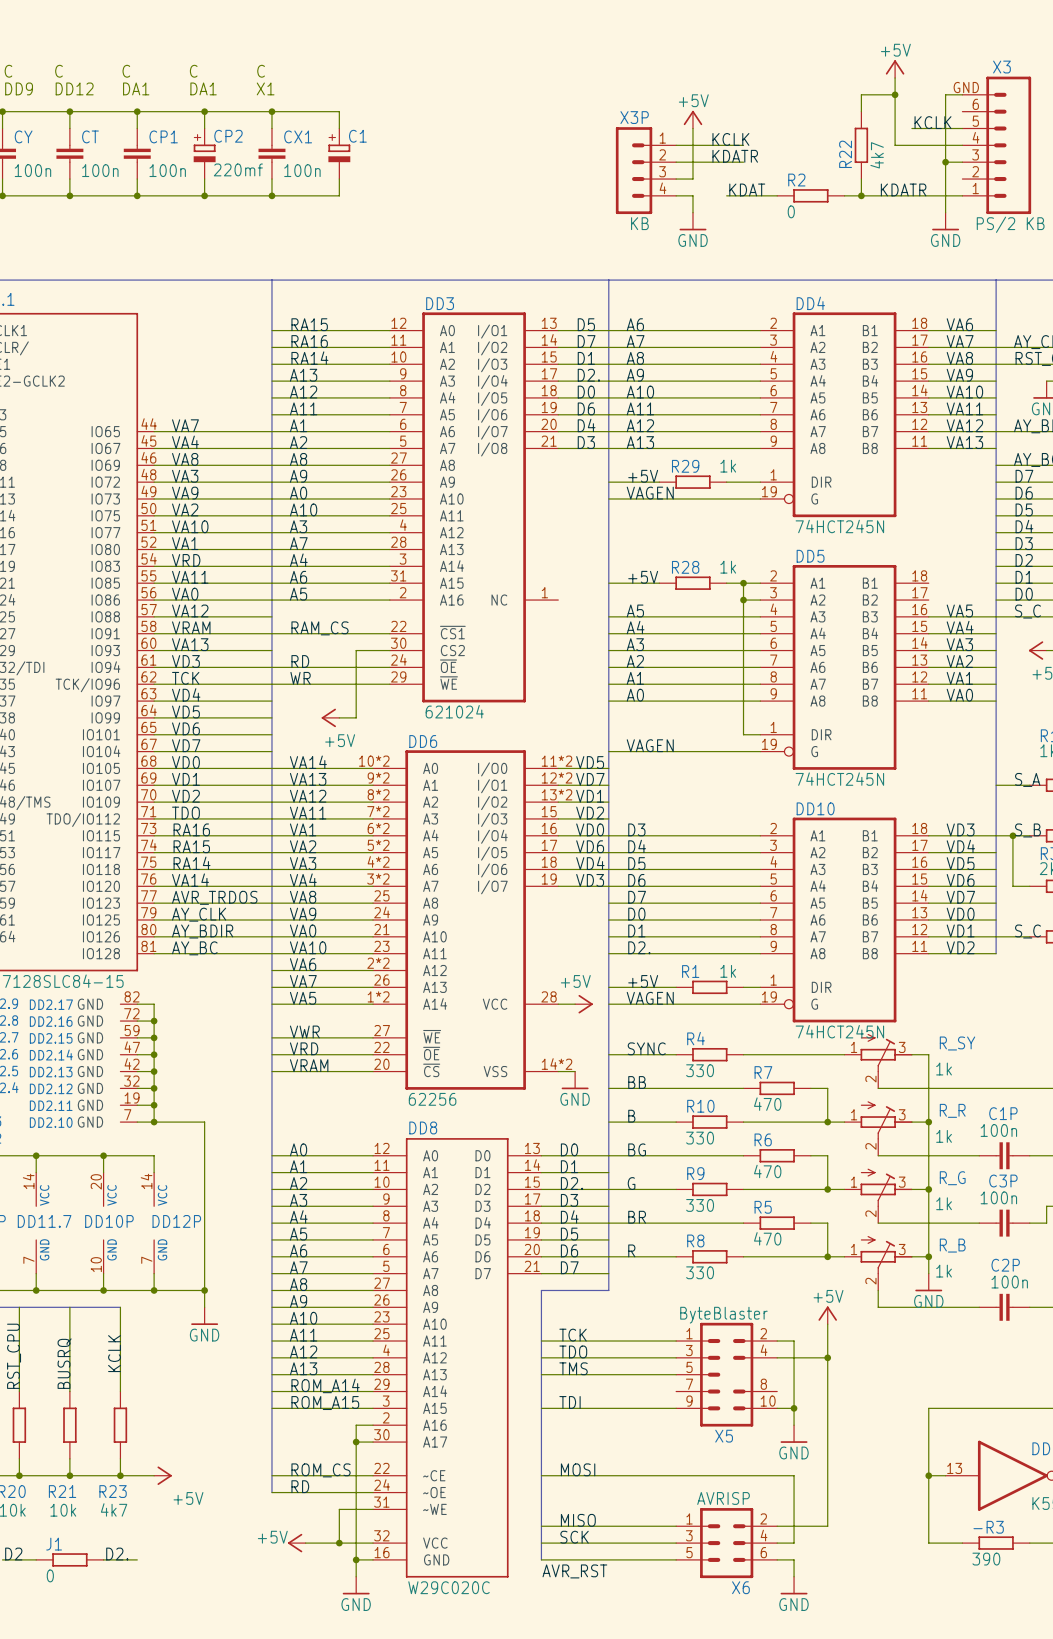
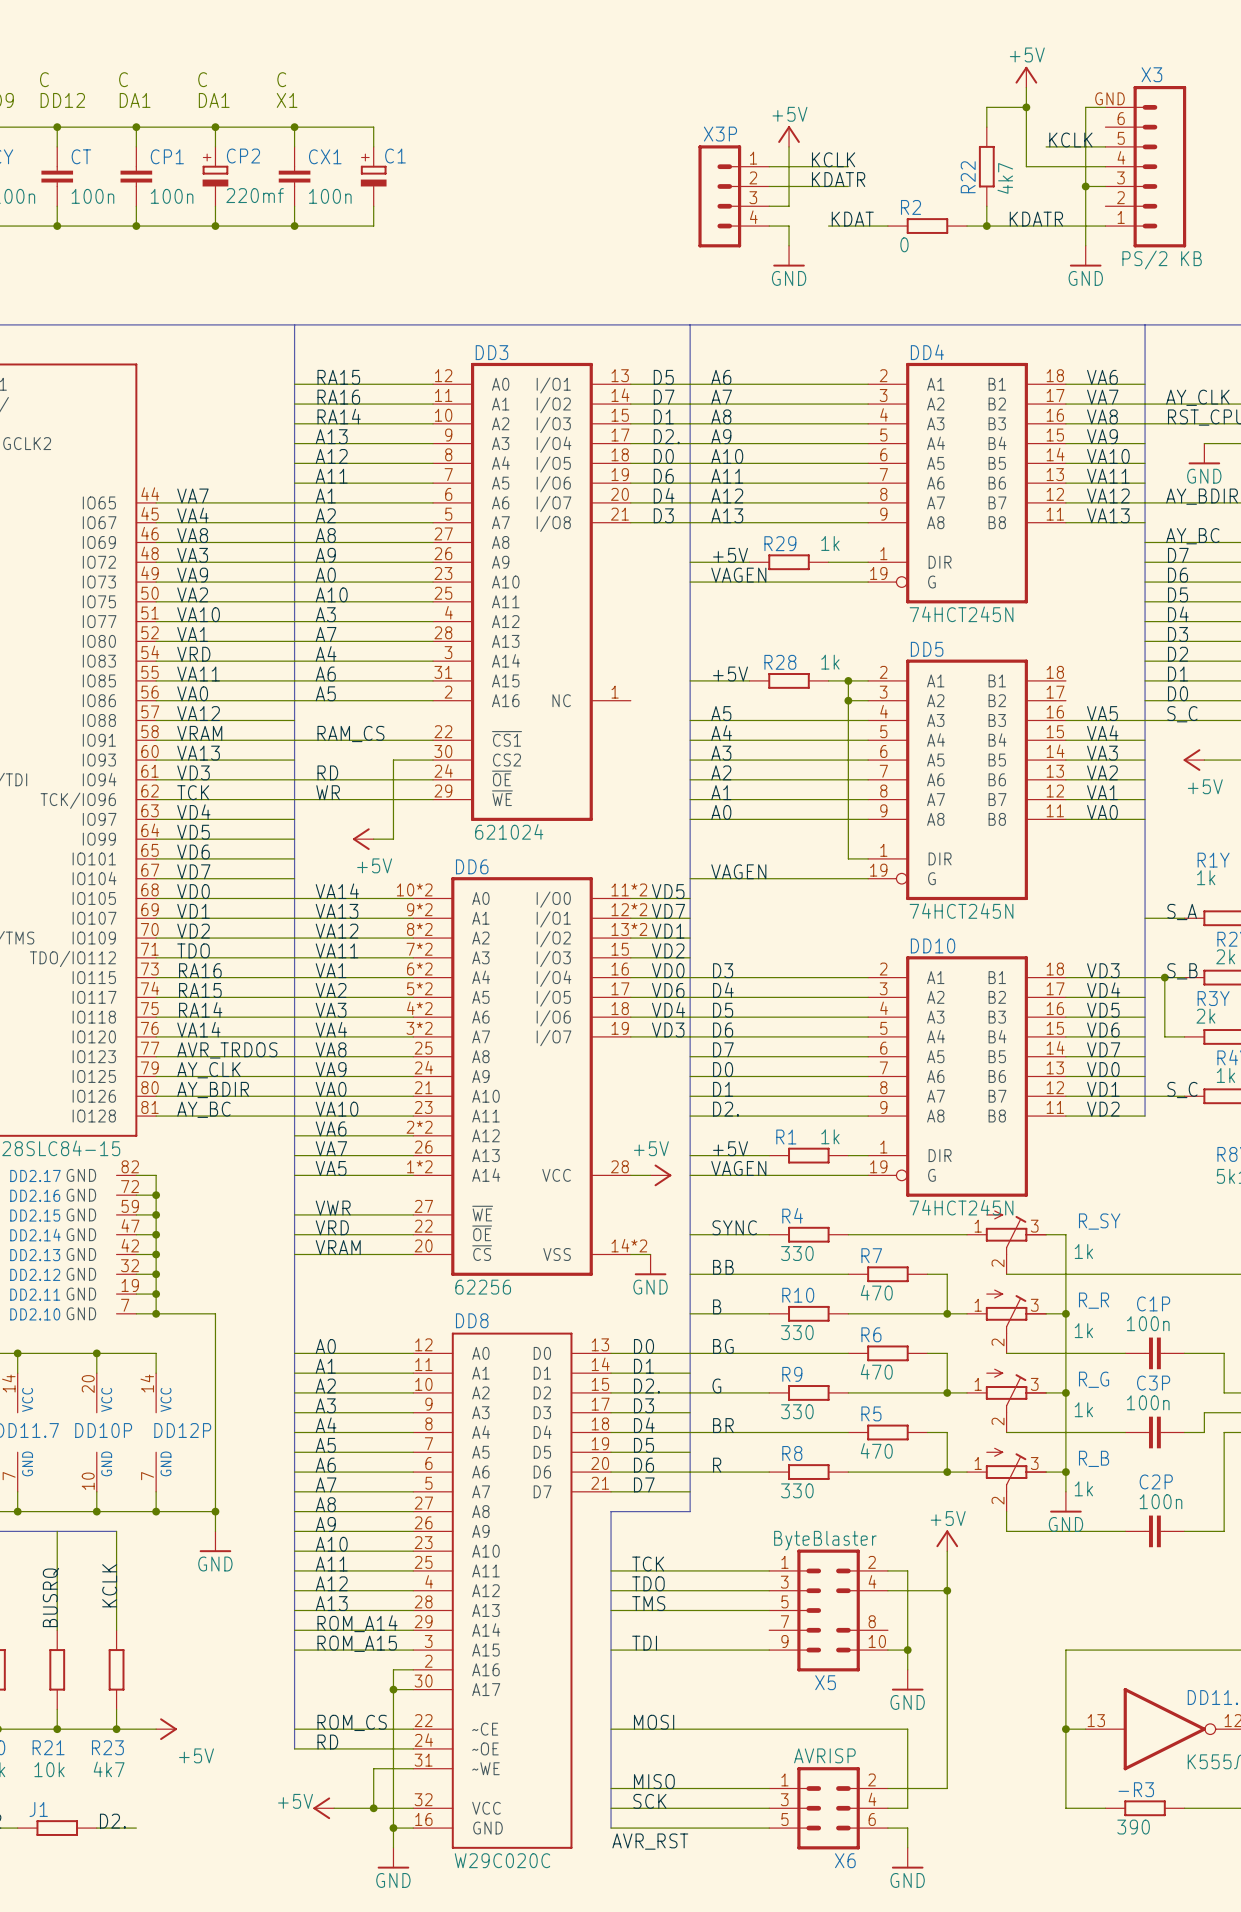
X3P value: KB (639, 223) -> none
J1 value: 0 (50, 1575) -> none

